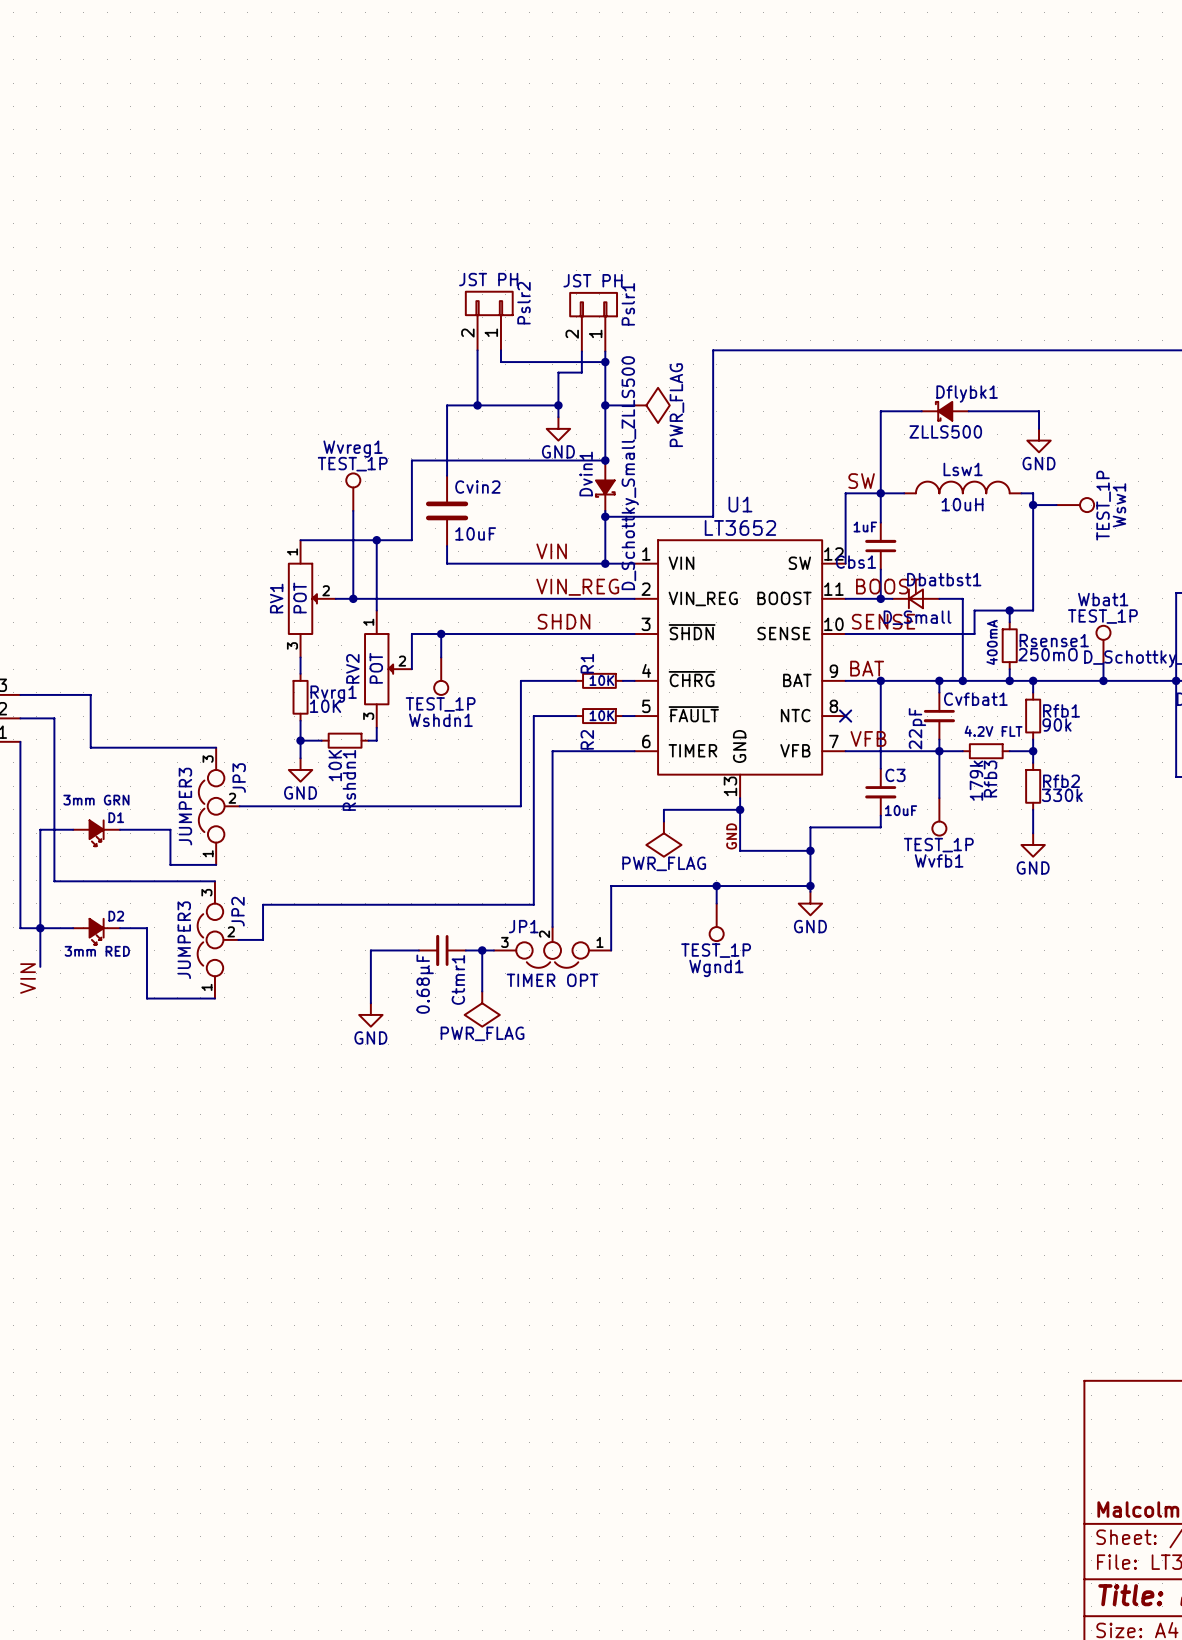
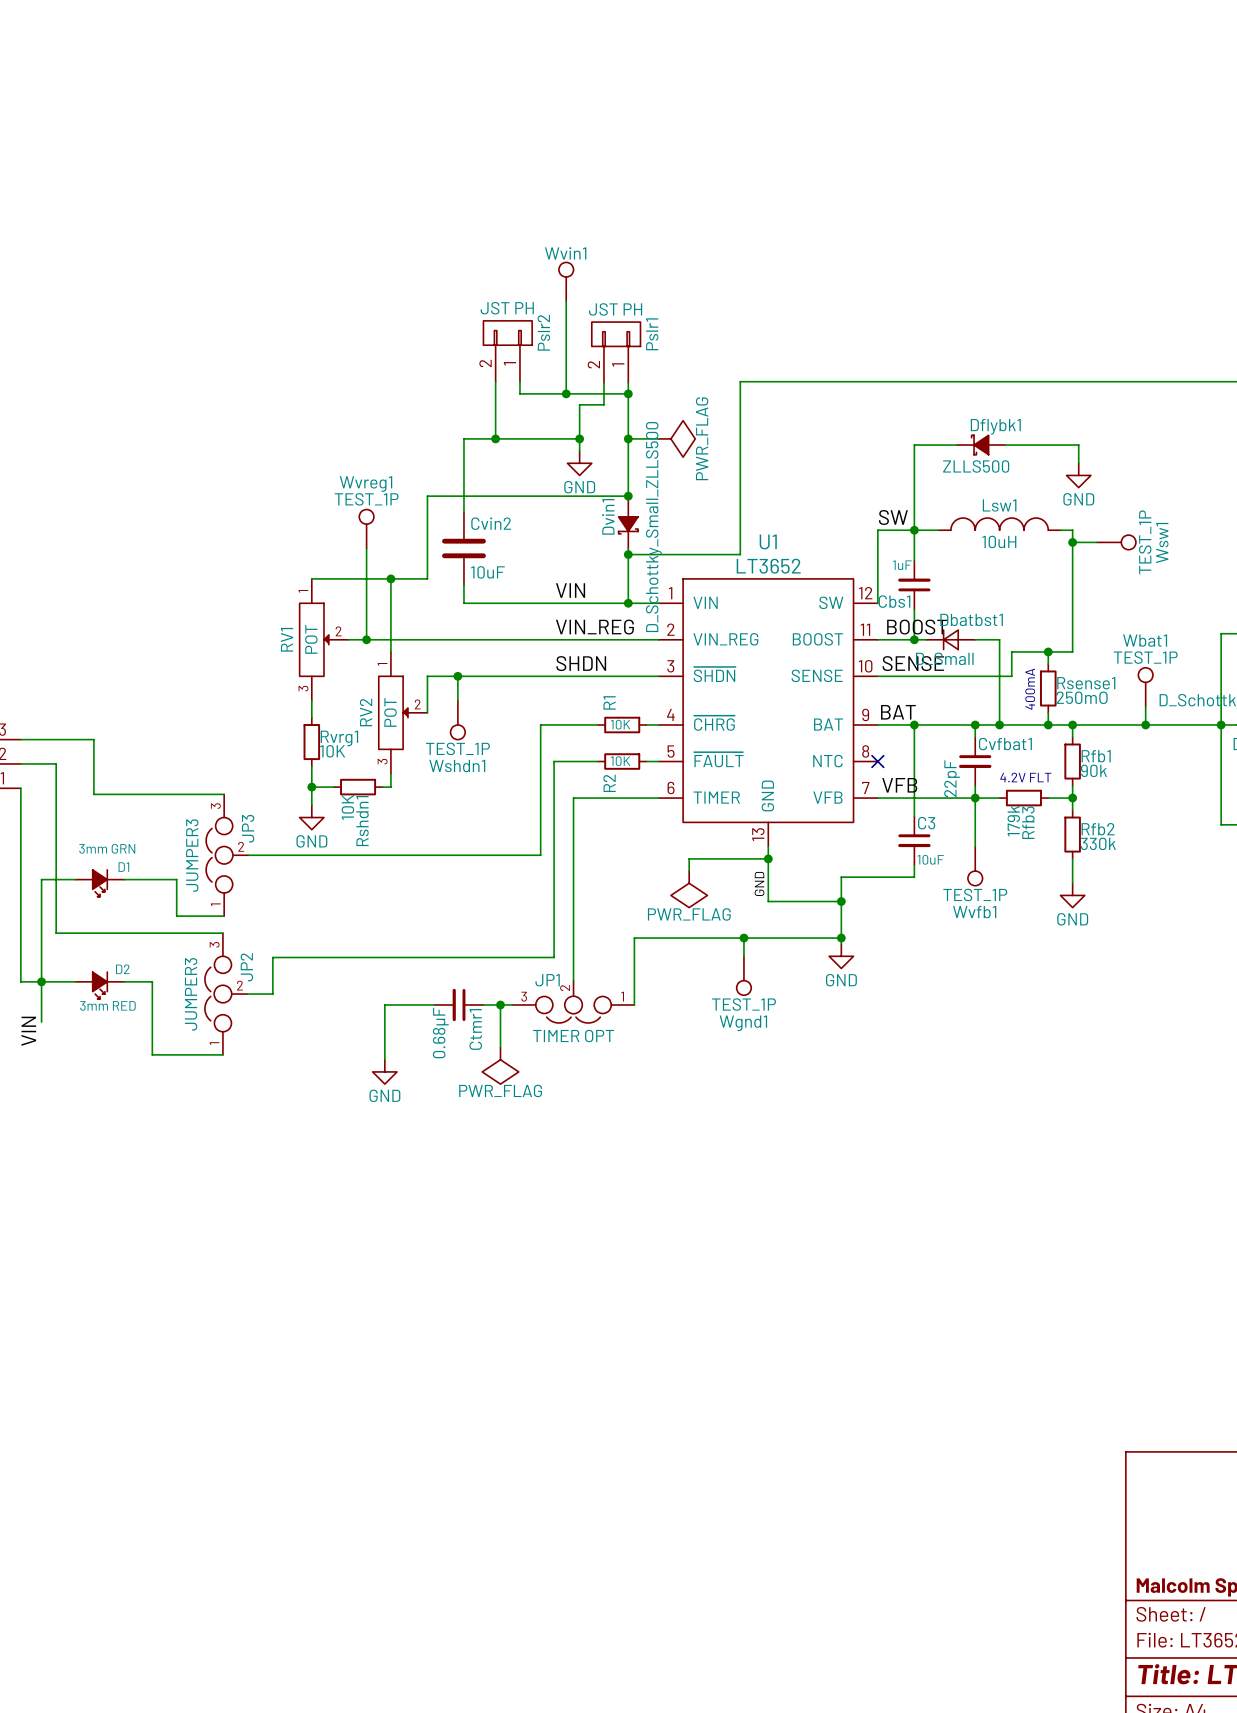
Wvin1: none -> (566, 281)
wire: none -> (566, 301) (566, 393)
junction: none -> (566, 393)

